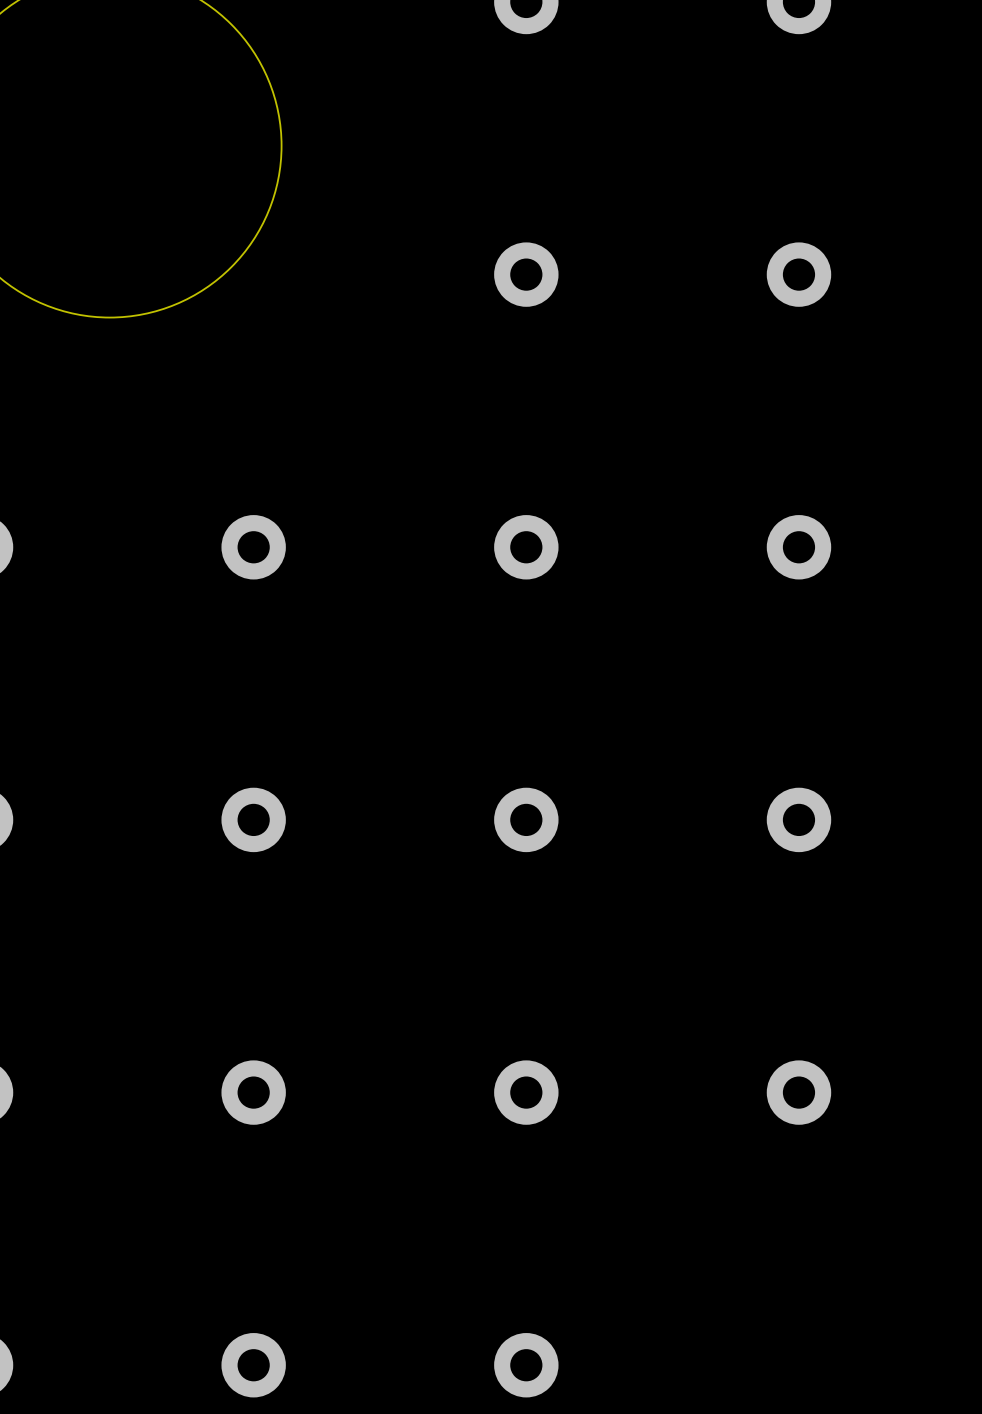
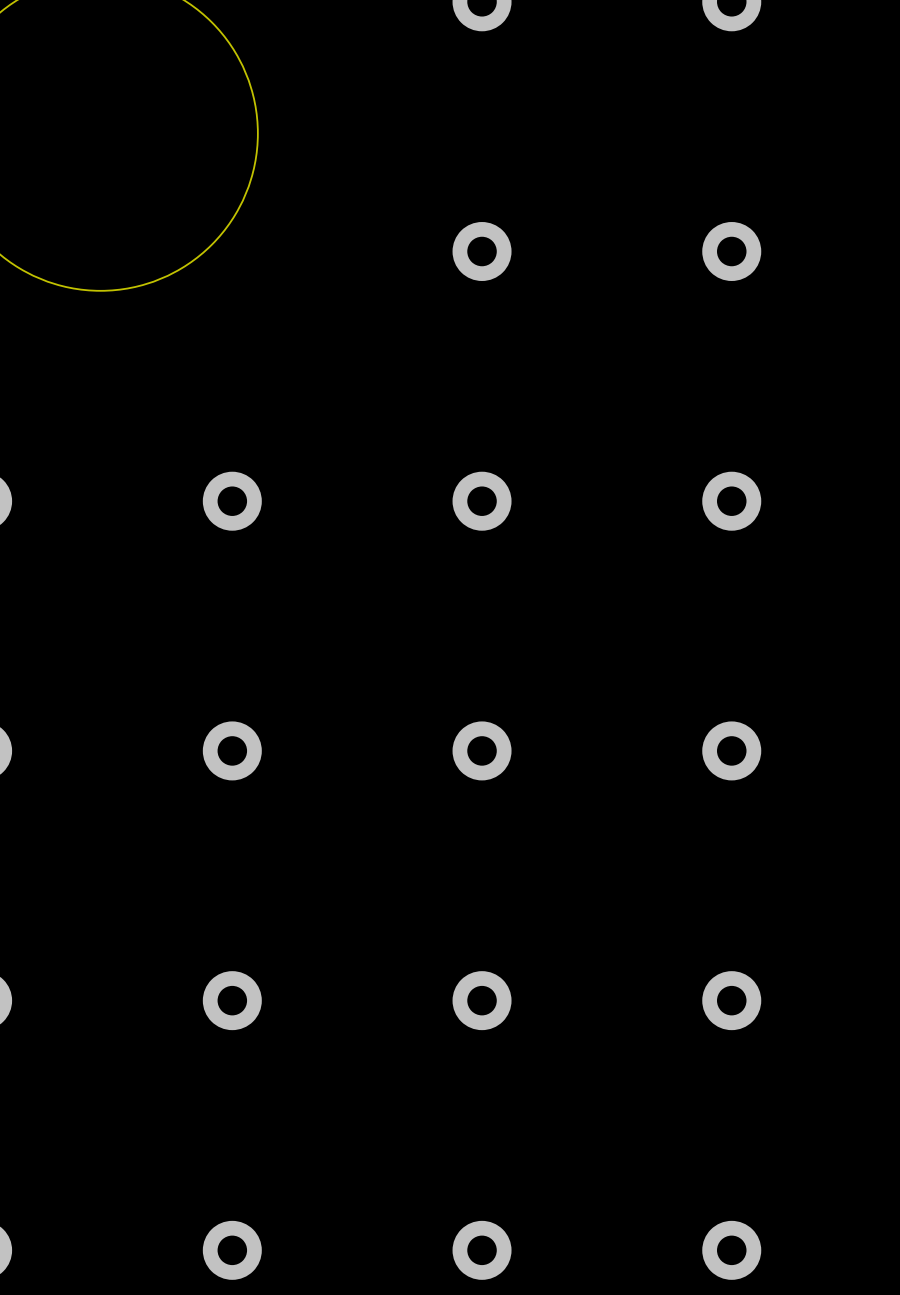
via: none -> (731, 1250)

